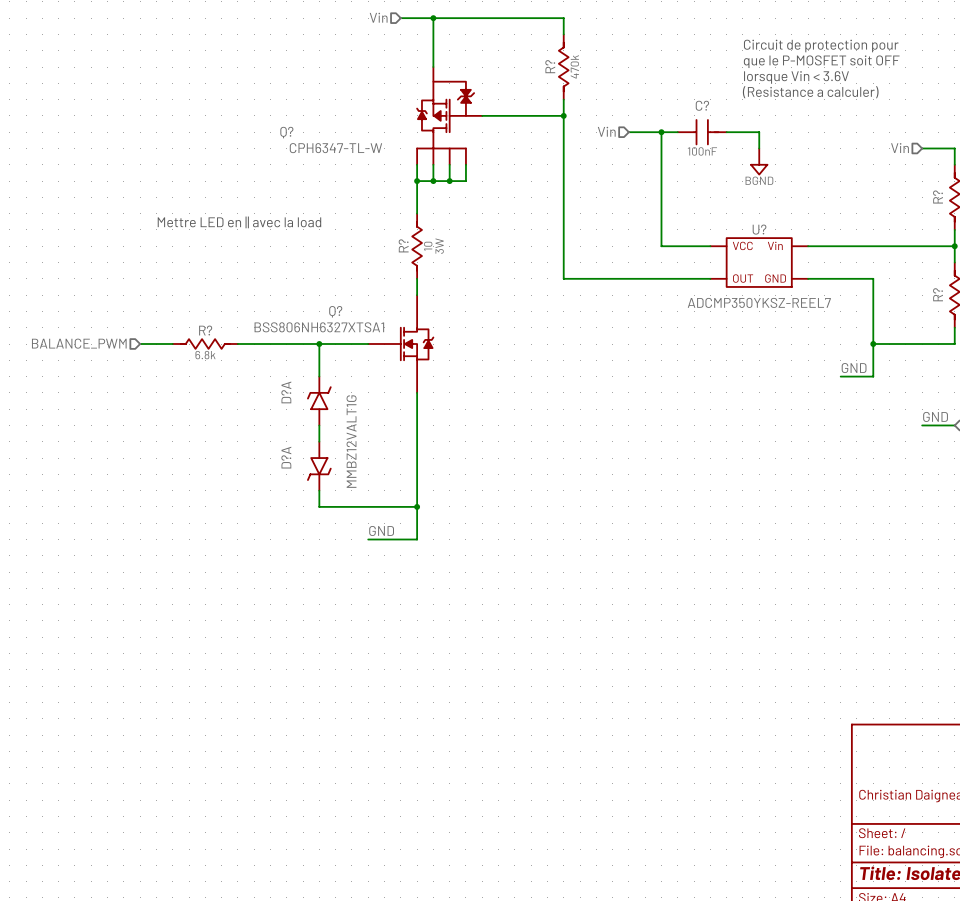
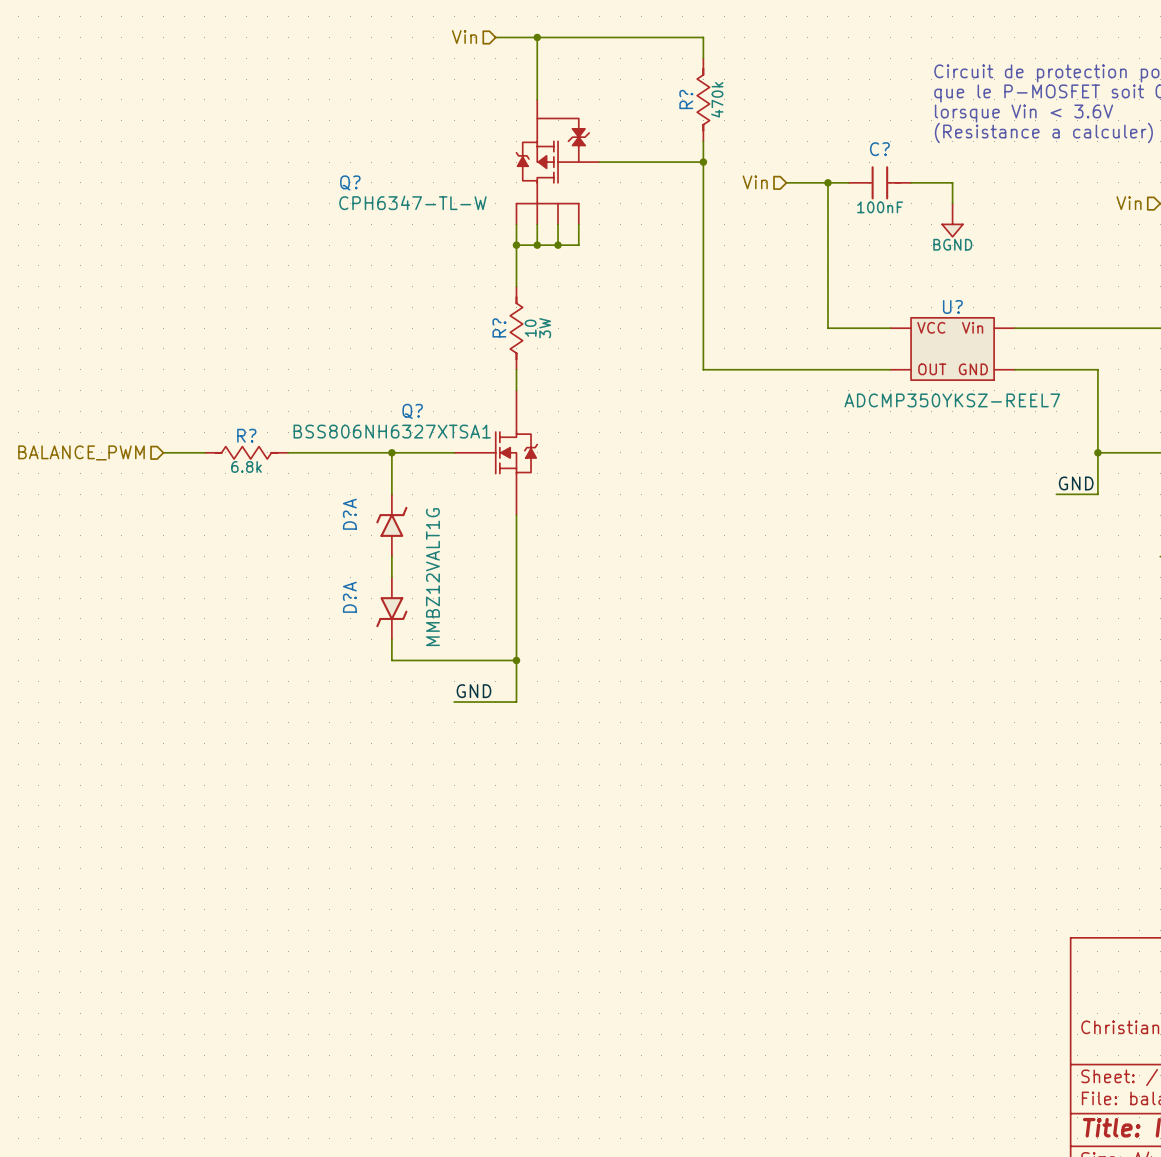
text: Mettre LED en || avec la load (239, 222) -> none

